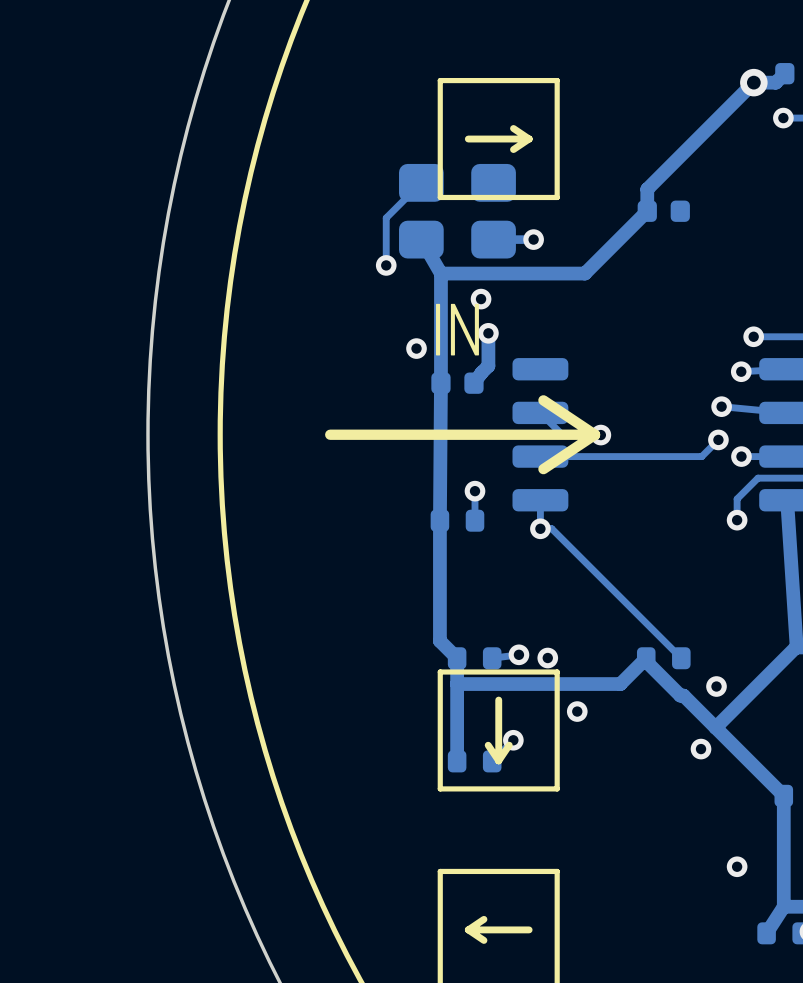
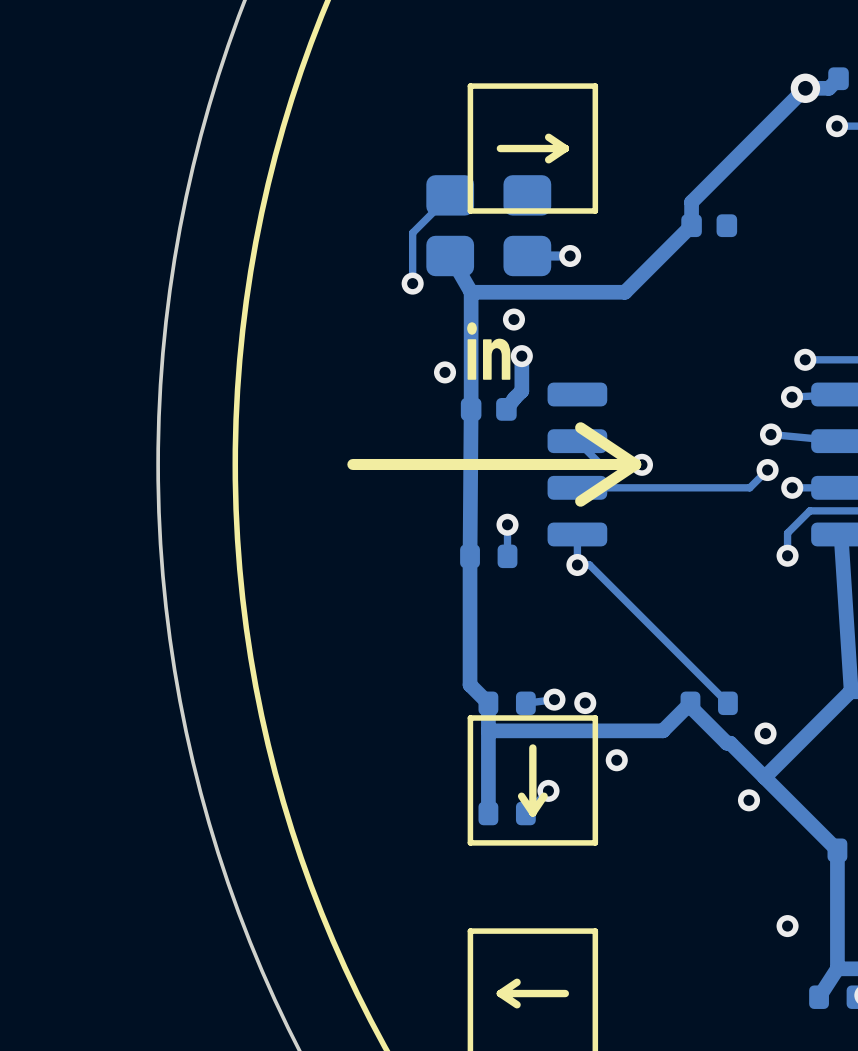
text: IN (457, 329) -> in (488, 351)

